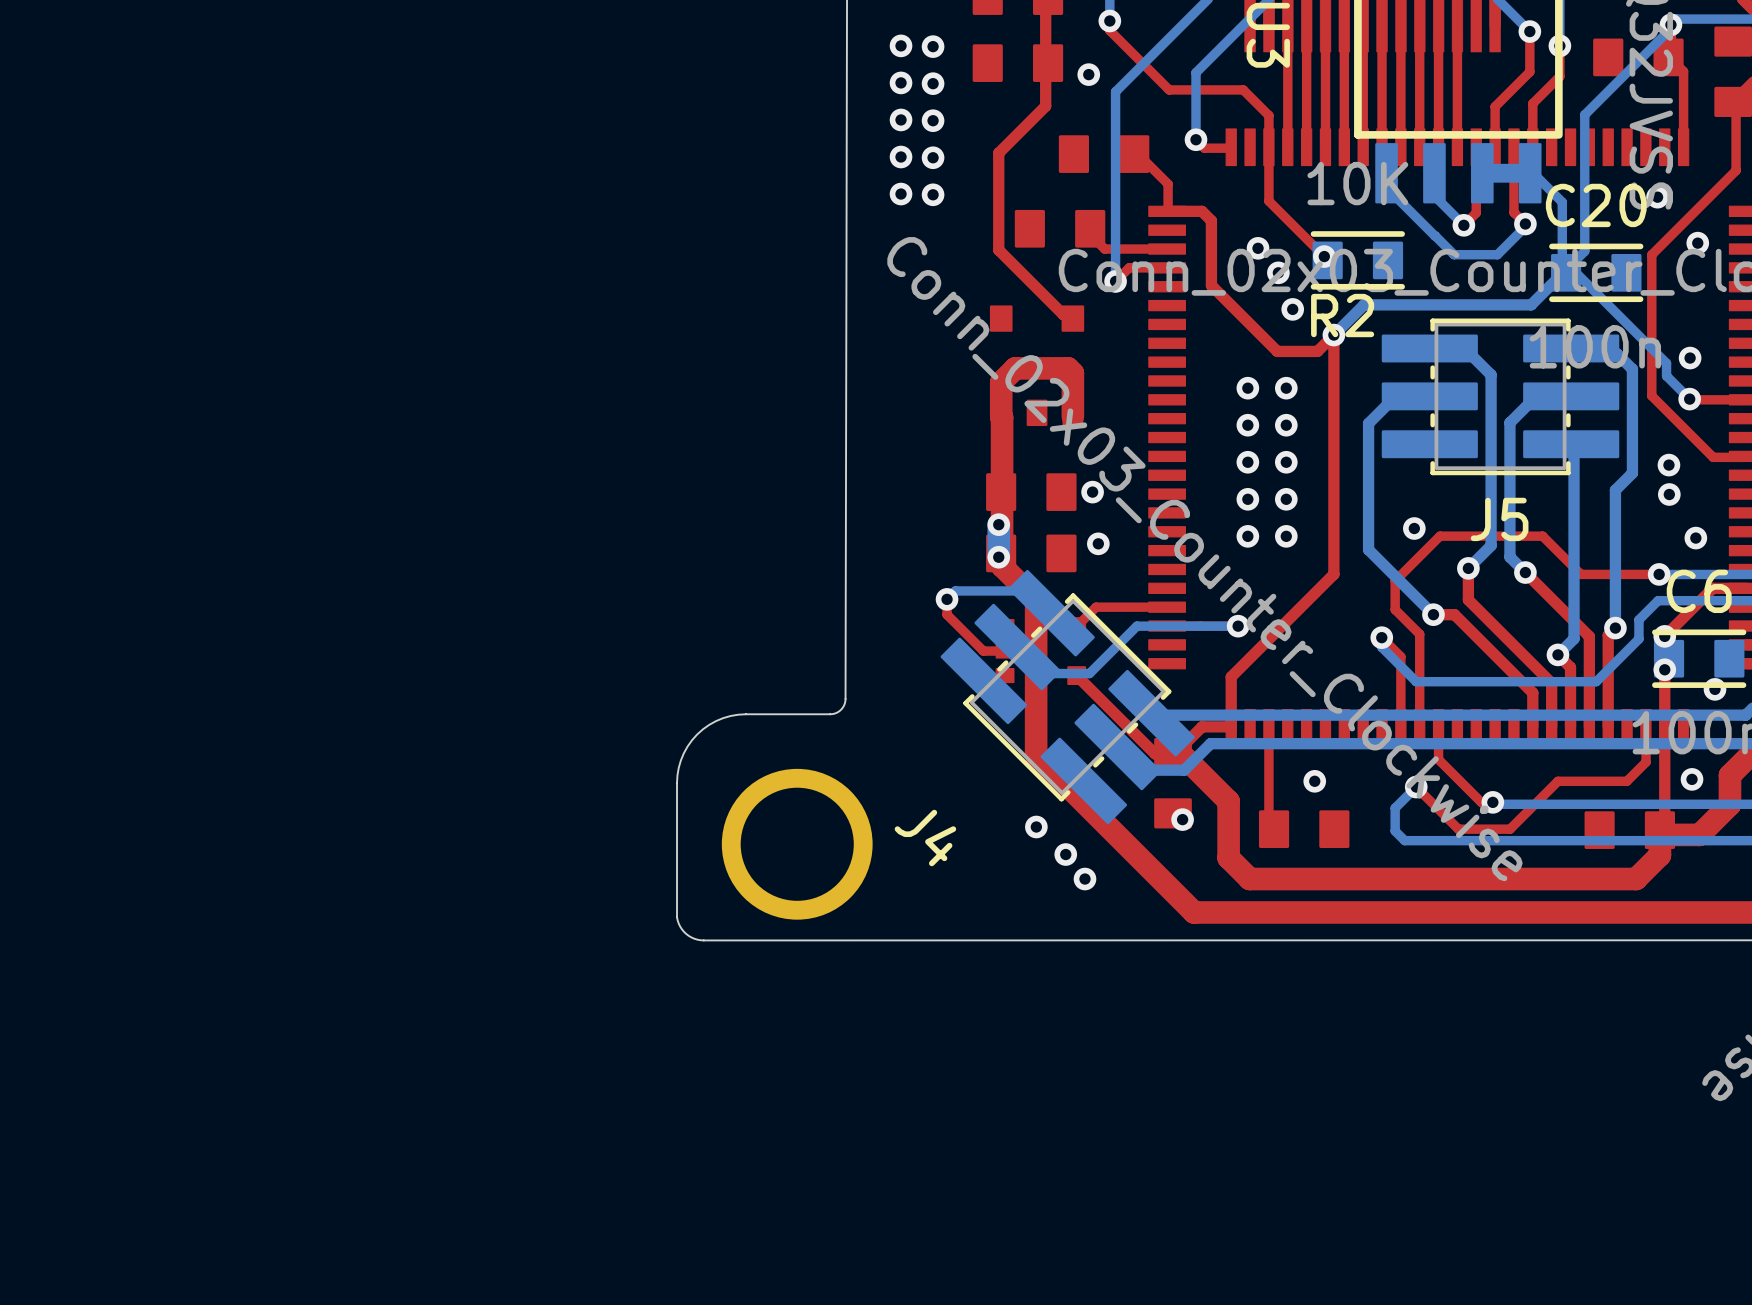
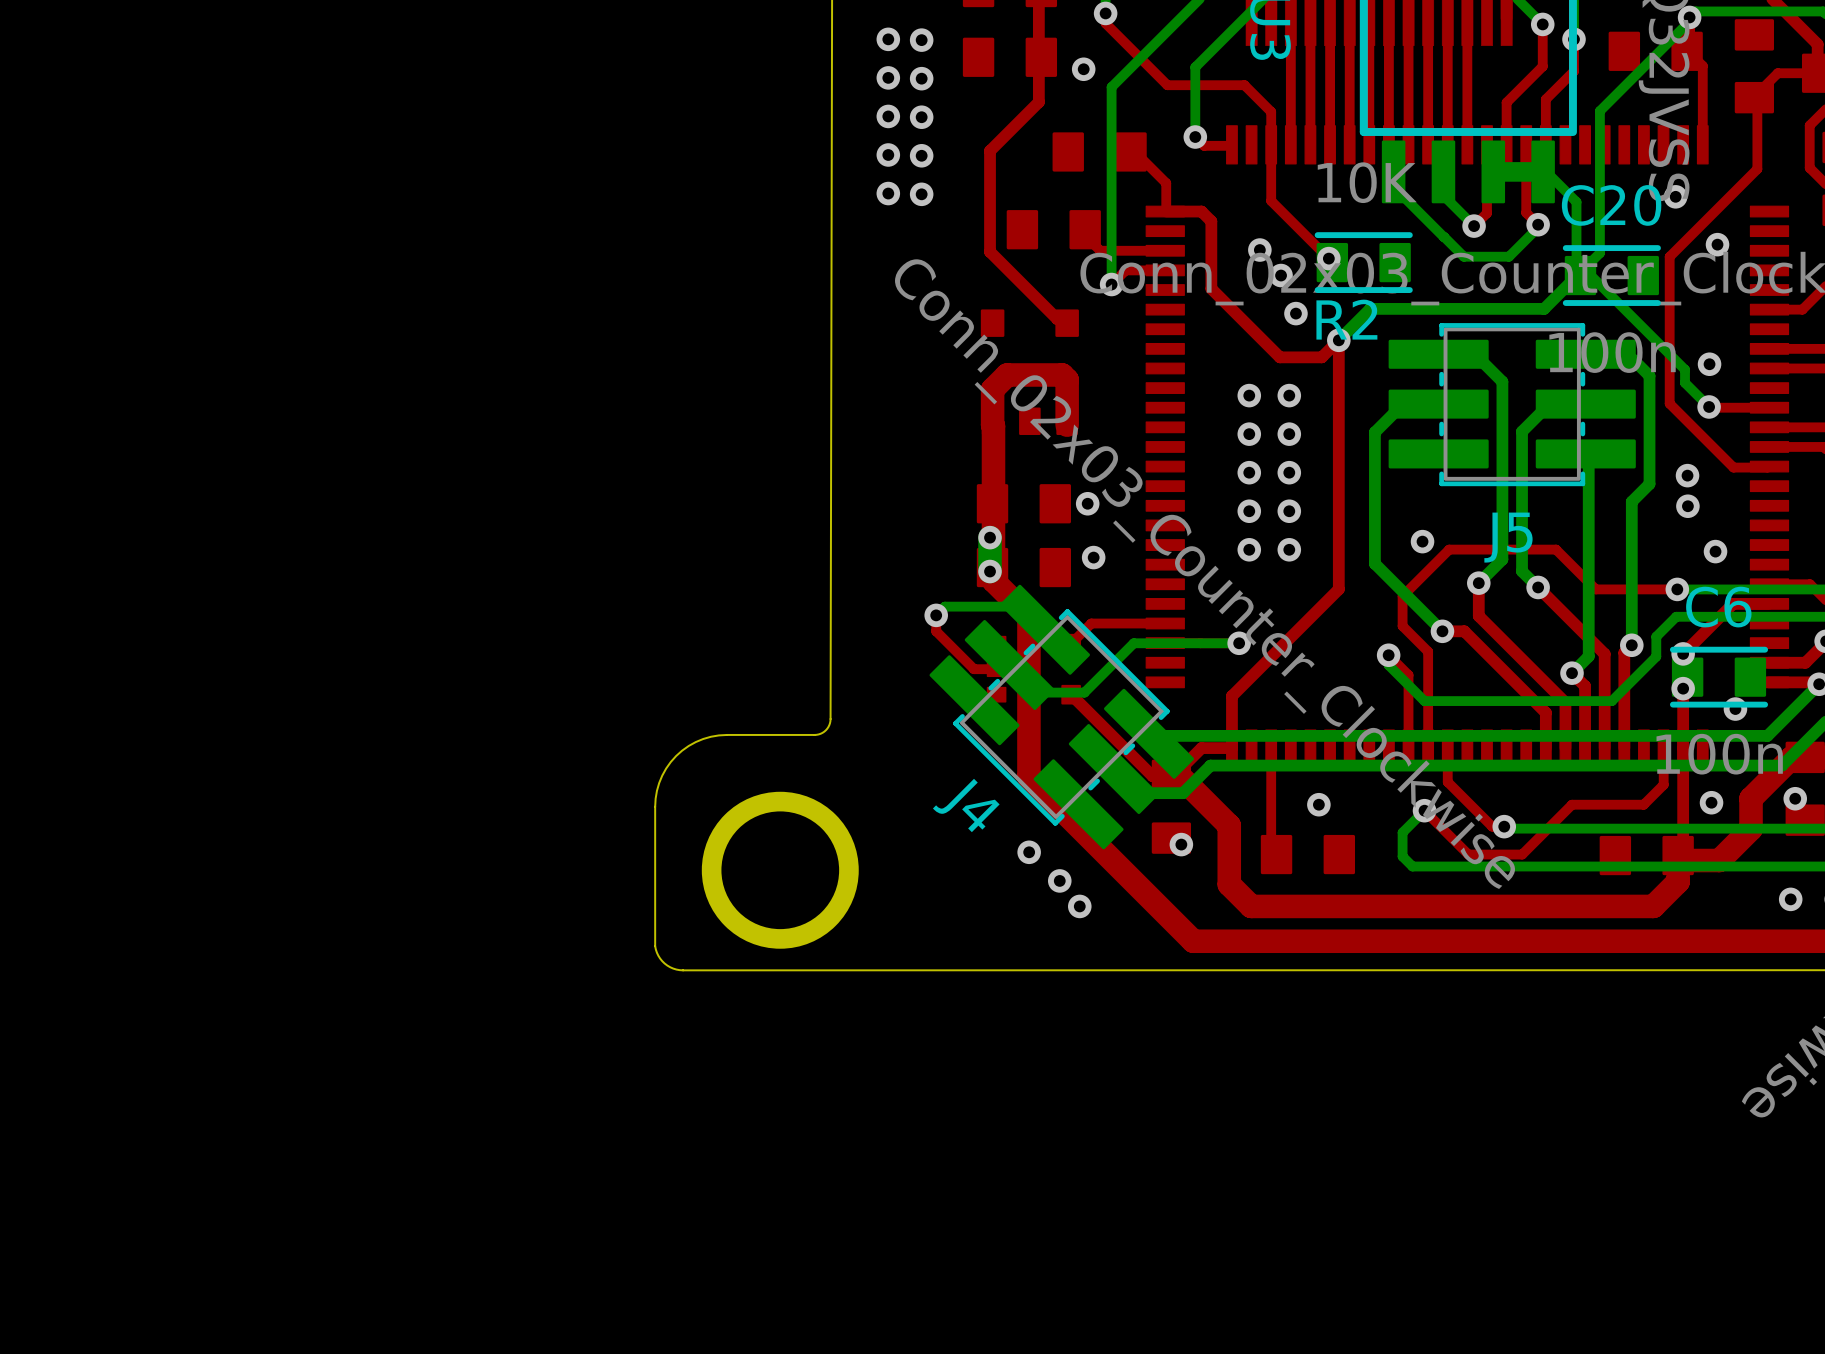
J4 name position: J4 (925, 838) -> J4 (966, 805)

